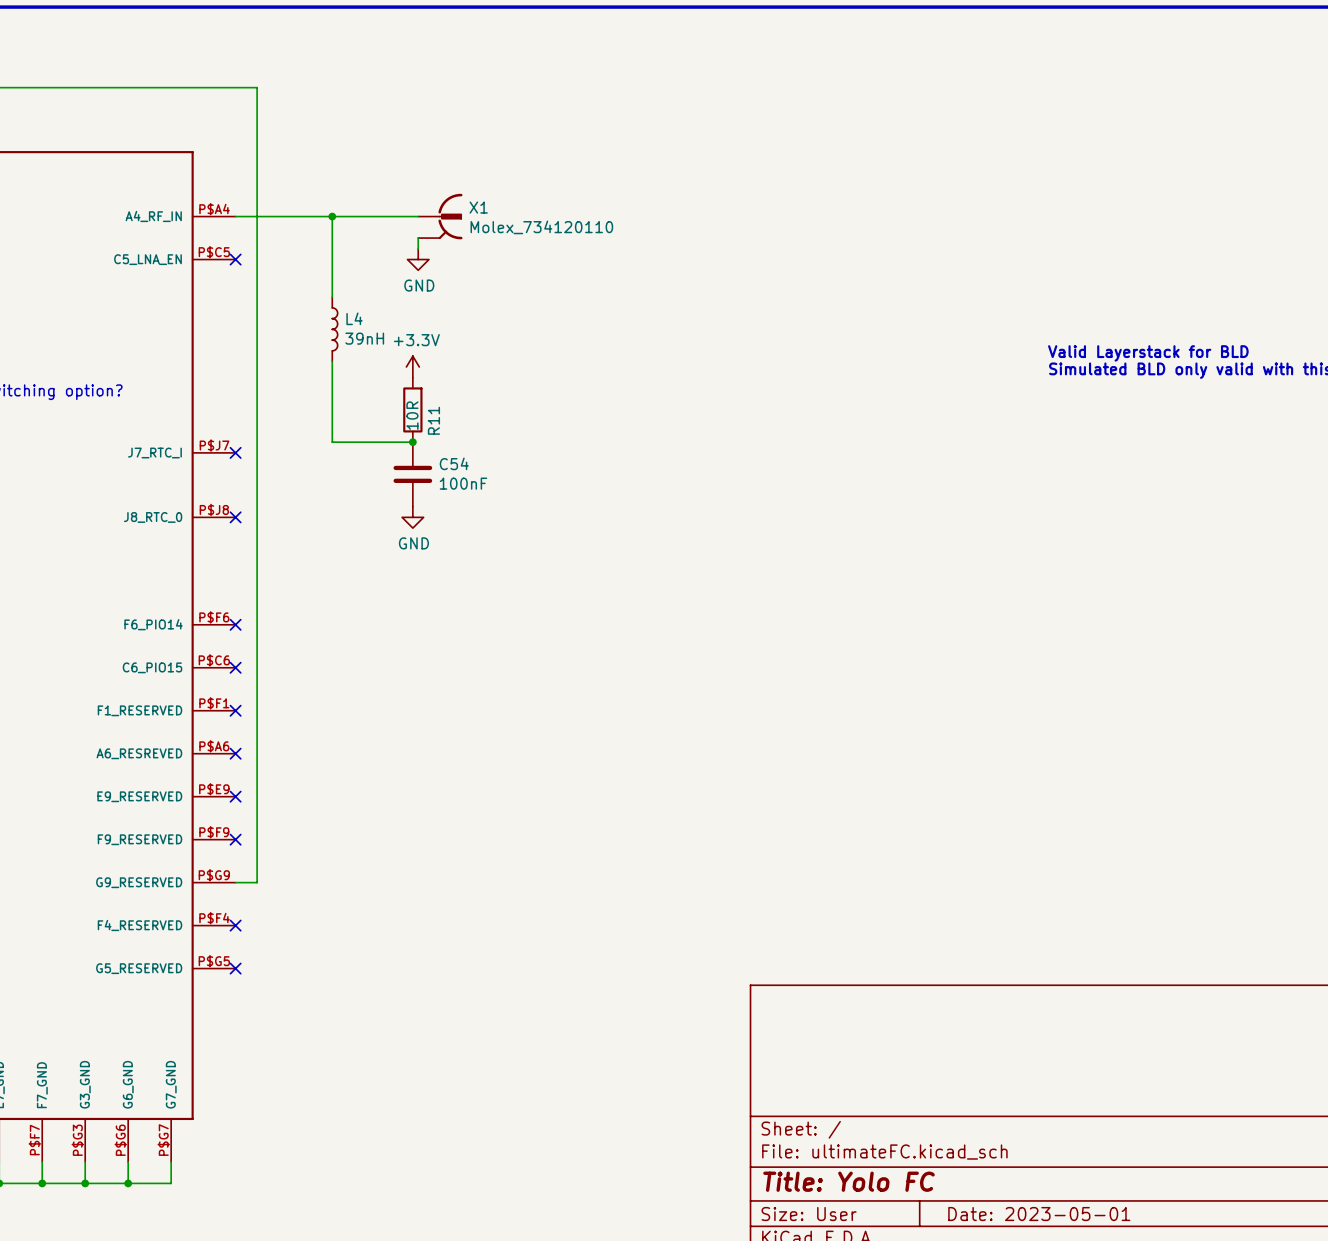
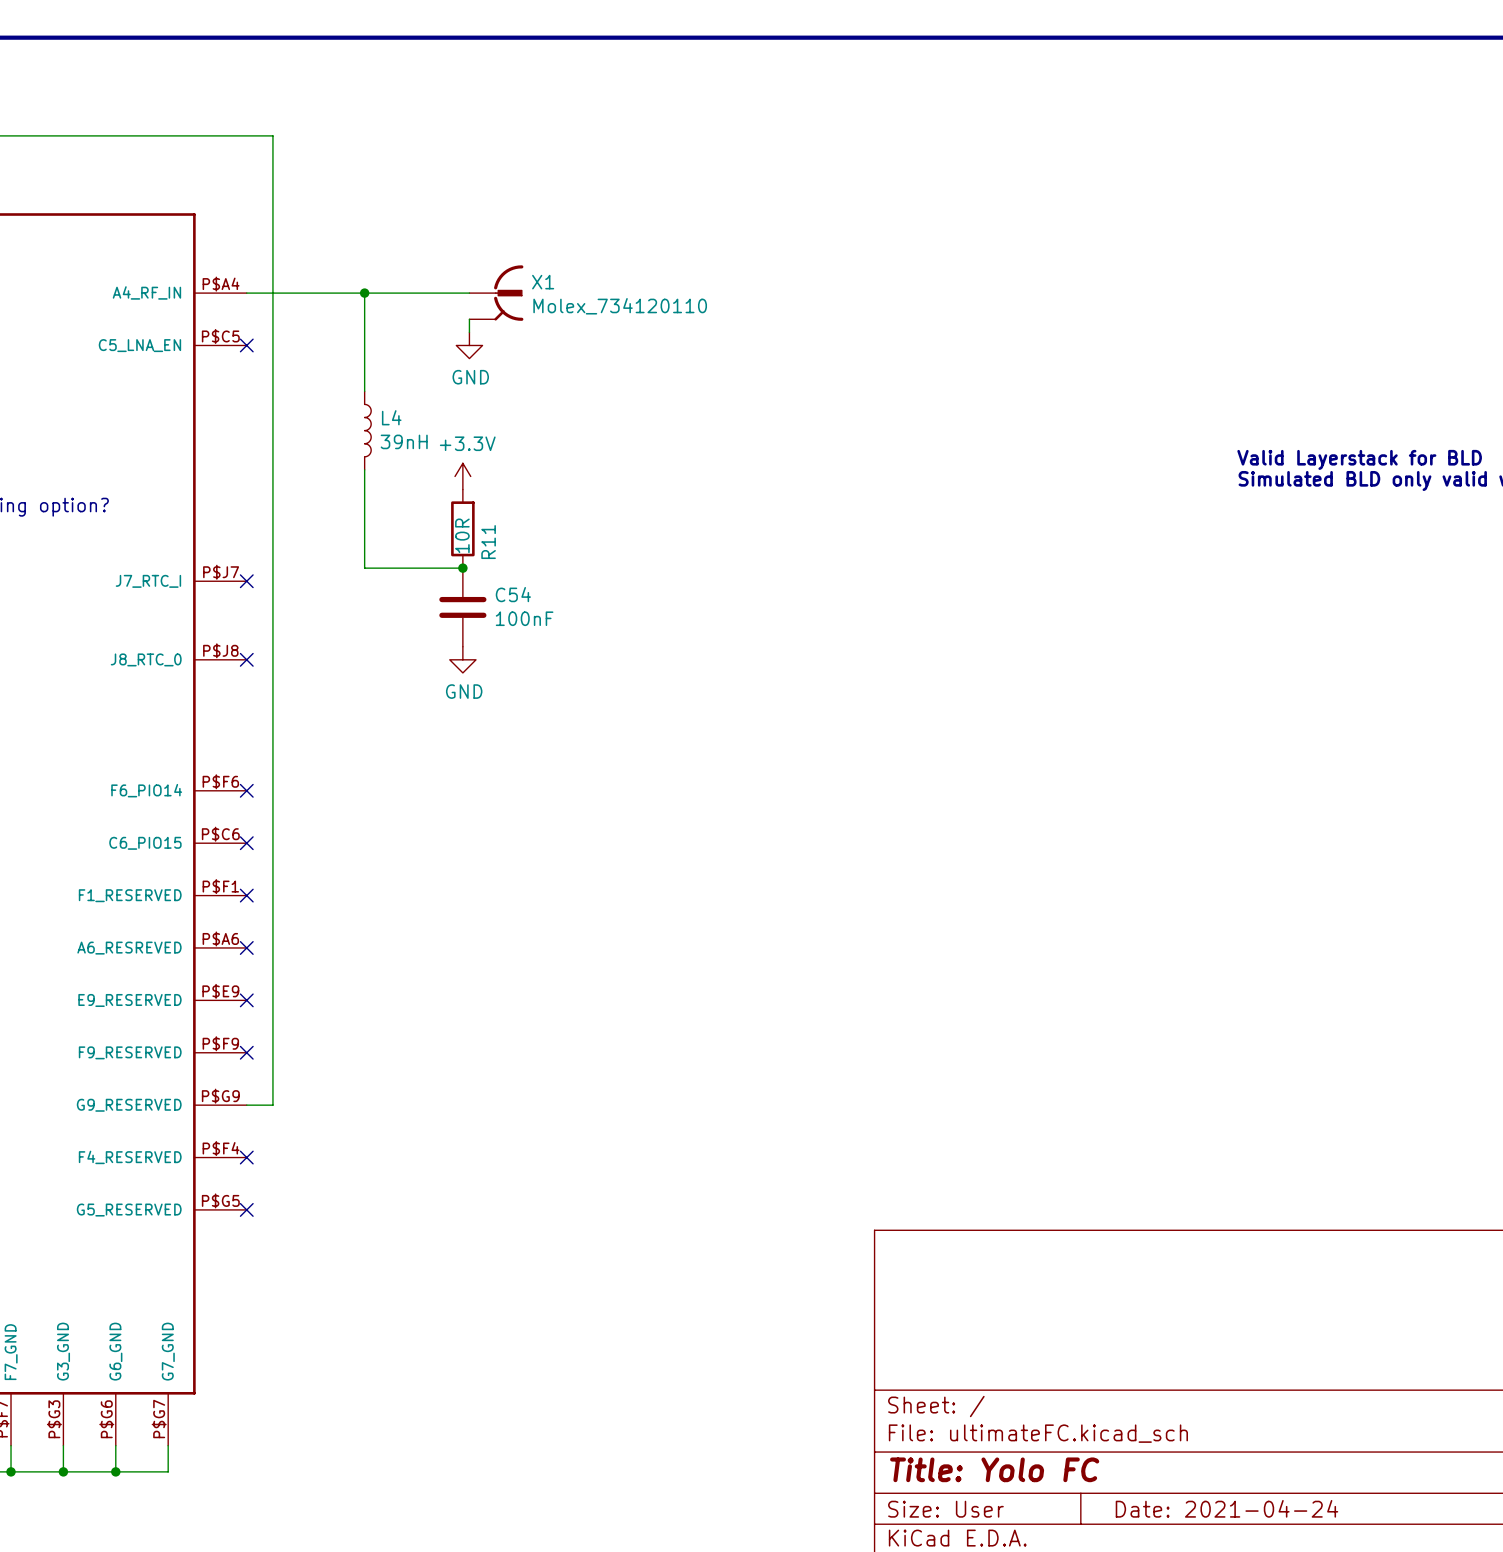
title block: Date: 2023-05-01 (1039, 1214) -> Date: 2021-04-24 (1226, 1508)

